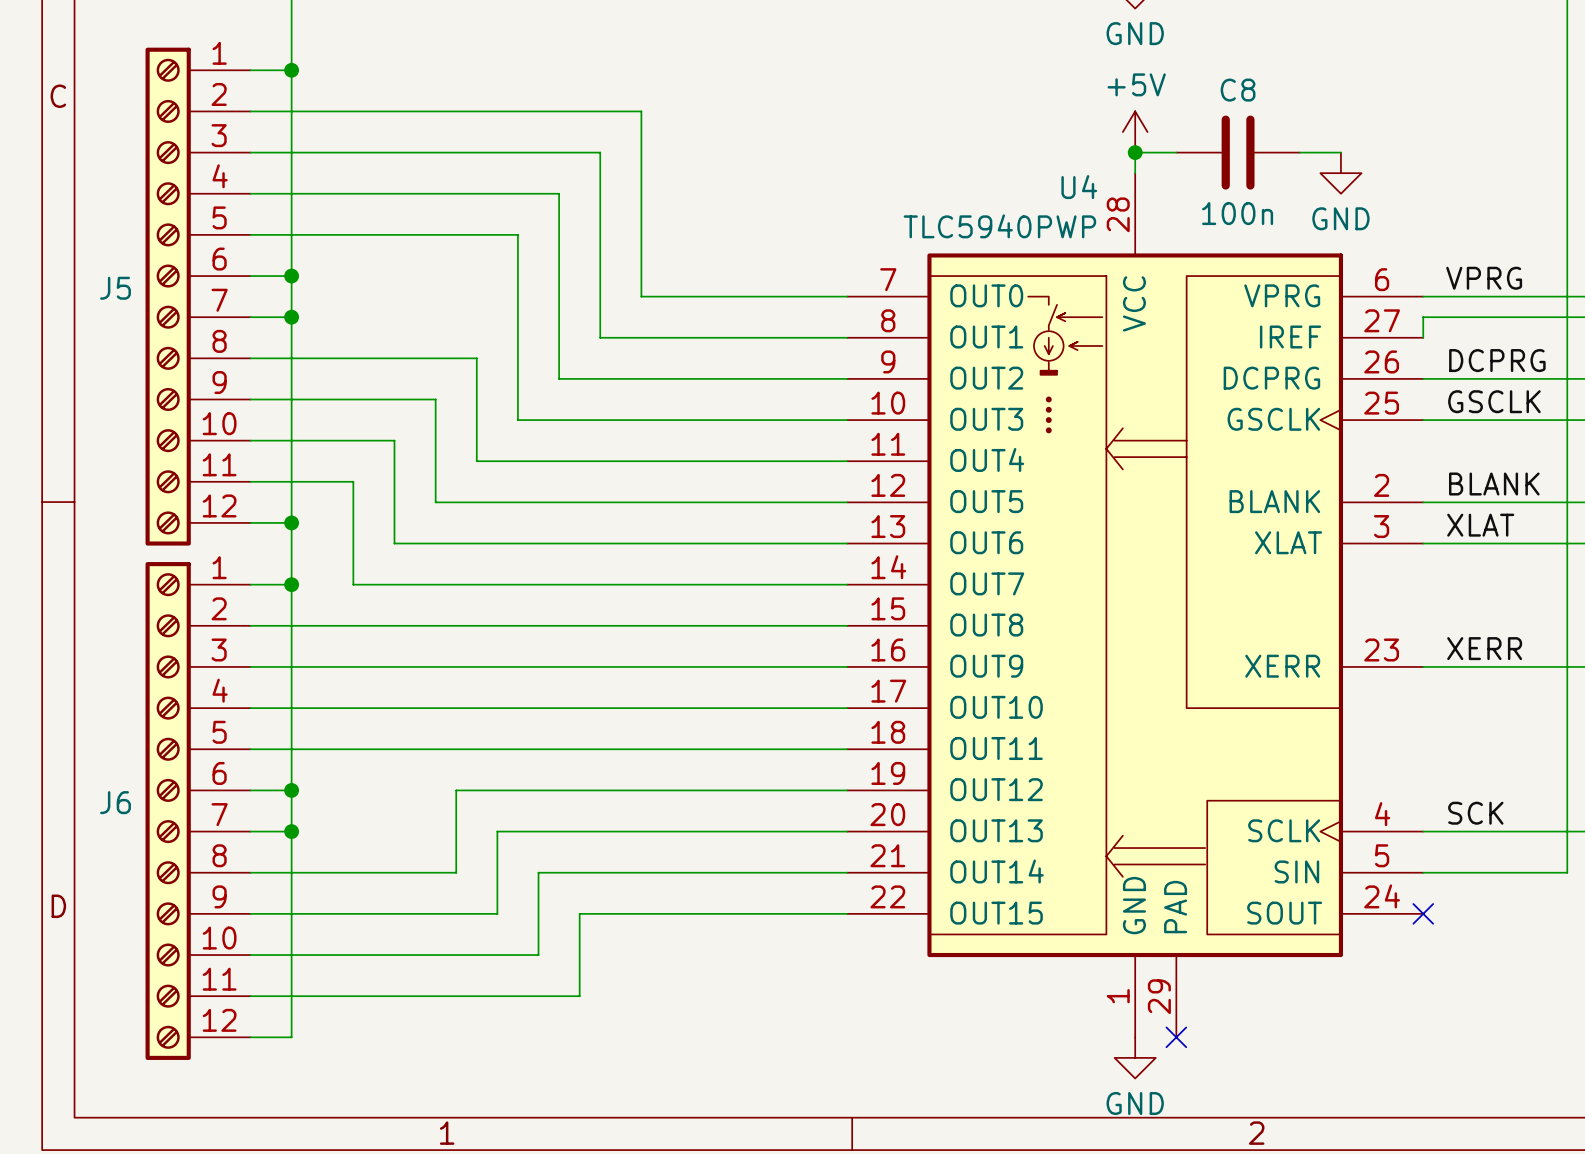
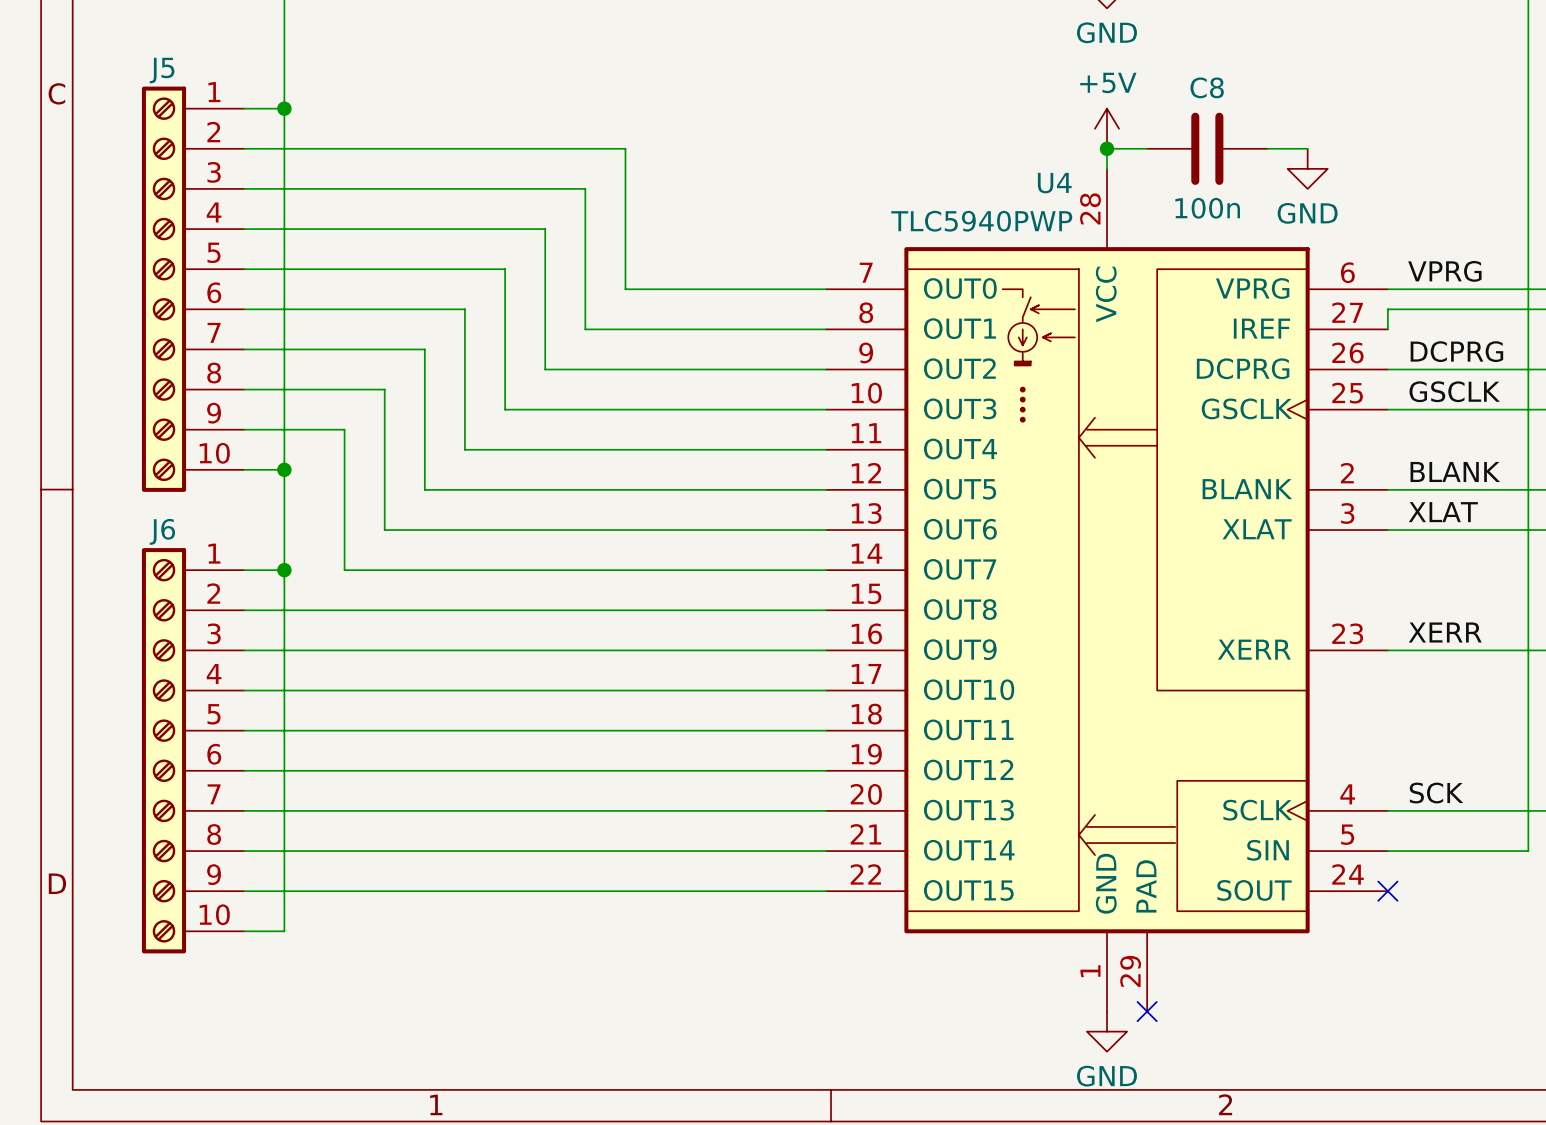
J5 symbol: [145, 47, 251, 546] -> [141, 86, 245, 492]
wire: (250, 70) (291, 70) -> (545, 188) (585, 188)
junction position: (291, 70) -> (284, 108)
wire: (291, 111) (641, 111) (641, 152) -> none
wire: (600, 152) (600, 193) -> (585, 148) (625, 148)
wire: (559, 193) (559, 234) -> (505, 229) (545, 229)
wire: (517, 234) (517, 276) -> (284, 269) (505, 269)
junction: (291, 276) -> none
J5 name position: J5 (115, 288) -> J5 (162, 70)
wire: none -> (284, 309) (464, 309) (464, 349)
junction: (291, 317) -> none
wire: (435, 358) (476, 358) -> (424, 349) (424, 389)
wire: (394, 399) (435, 399) -> (384, 389) (384, 429)
wire: (353, 440) (394, 440) -> (344, 429) (344, 469)
wire: (291, 481) (353, 481) -> none
wire: (250, 522) (291, 522) -> none
junction position: (291, 522) -> (284, 469)
J6 symbol: [145, 562, 251, 1060] -> [141, 548, 245, 954]
wire: none -> (284, 770) (444, 770)
junction: (291, 790) -> none
wire: (456, 790) (456, 872) -> (525, 851) (444, 851)
J6 name position: J6 (115, 802) -> J6 (162, 531)
wire: none -> (284, 810) (485, 810)
junction: (291, 831) -> none
wire: (497, 831) (497, 913) -> (565, 891) (485, 891)
wire: (538, 872) (538, 955) (291, 955) (291, 1037) (250, 1037) -> none
wire: (579, 913) (579, 996) (250, 996) -> none

